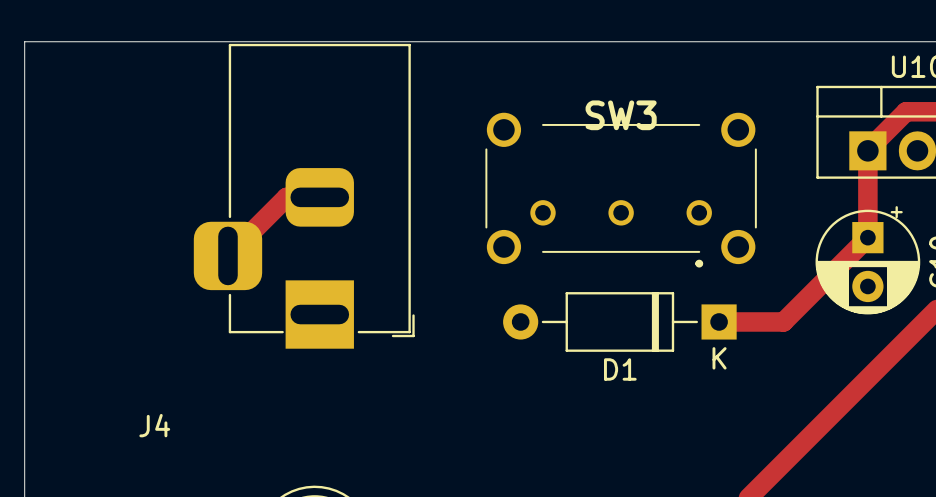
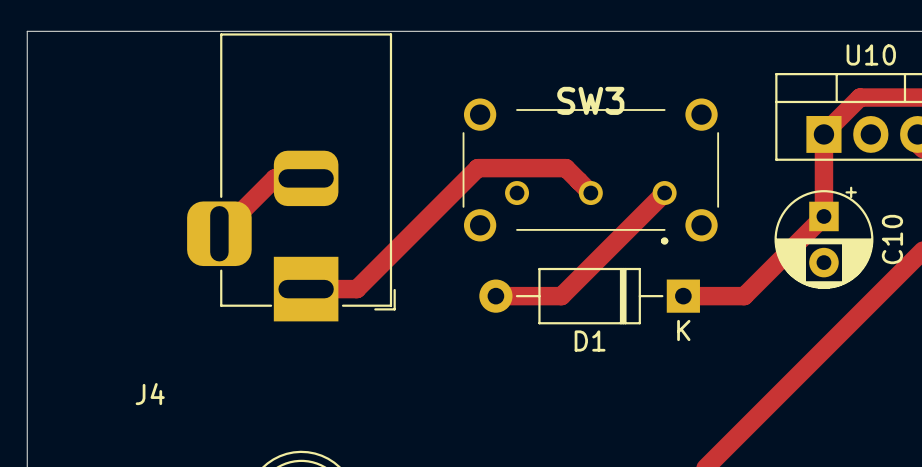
track: none -> (590, 193) (565, 168) (477, 168) (356, 289) (306, 289)
track: none -> (664, 193) (561, 296) (495, 296)

